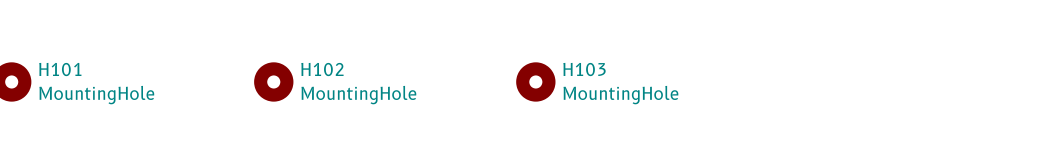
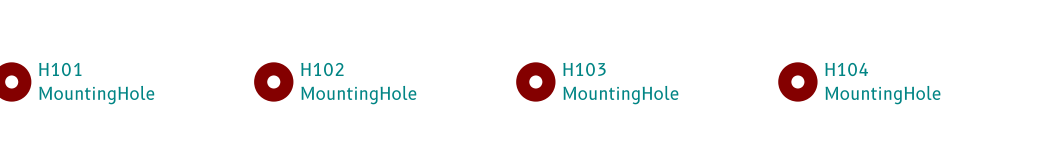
H104: none -> MountingHole (797, 81)

